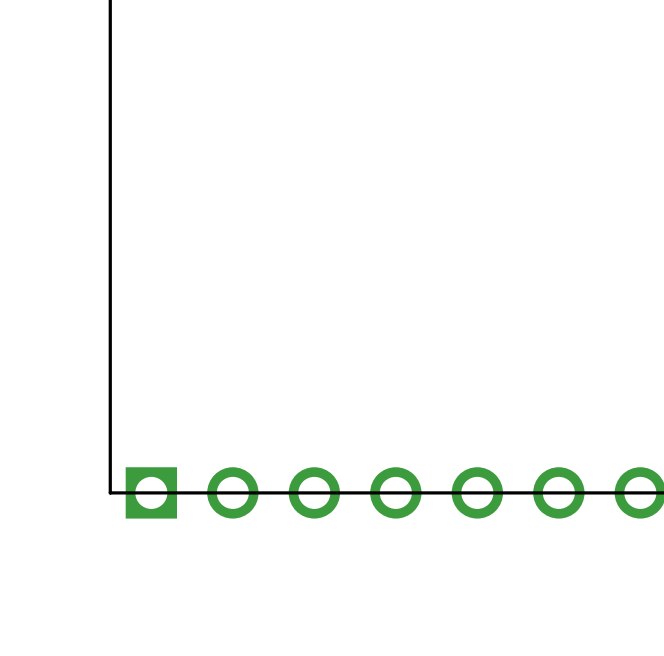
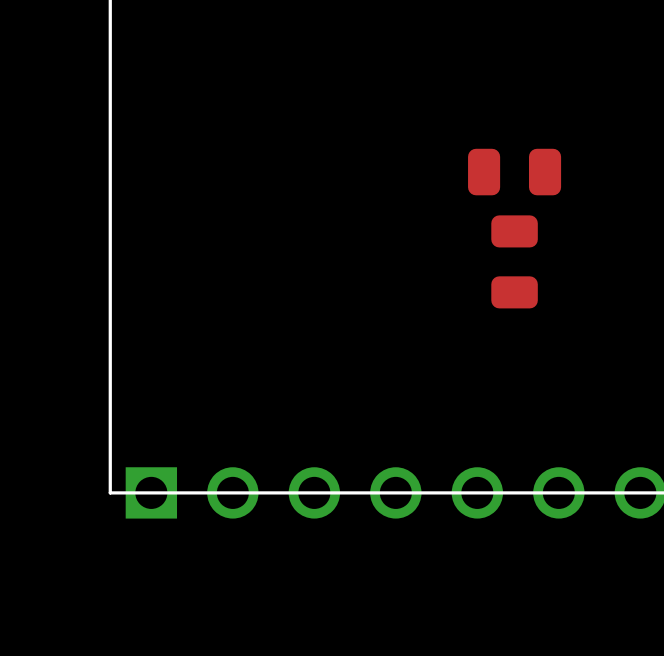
part: none -> (514, 172)
part: none -> (514, 261)

